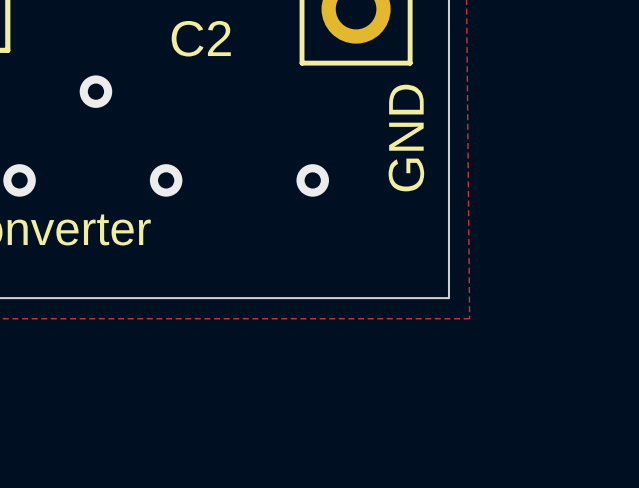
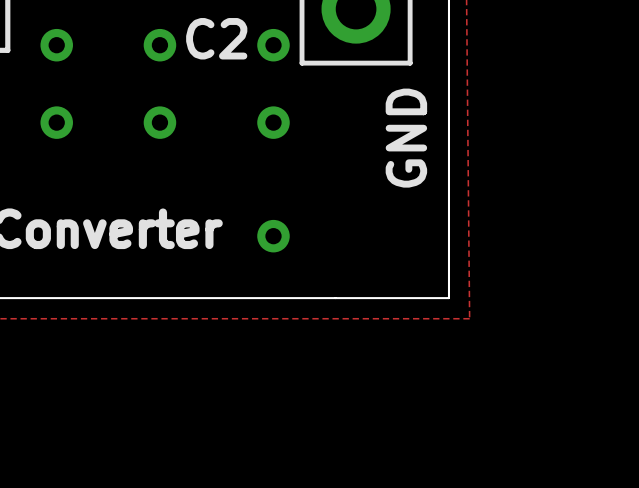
C2 name position: C2 (201, 38) -> C2 (216, 38)
via: none -> (56, 45)
via: none -> (159, 45)
via: none -> (273, 45)
via: (95, 91) -> none
via: none -> (56, 122)
via: none -> (159, 122)
via: none -> (273, 122)
via: (19, 180) -> none
via: (166, 180) -> none
via: (312, 180) -> none
via: none -> (273, 236)

